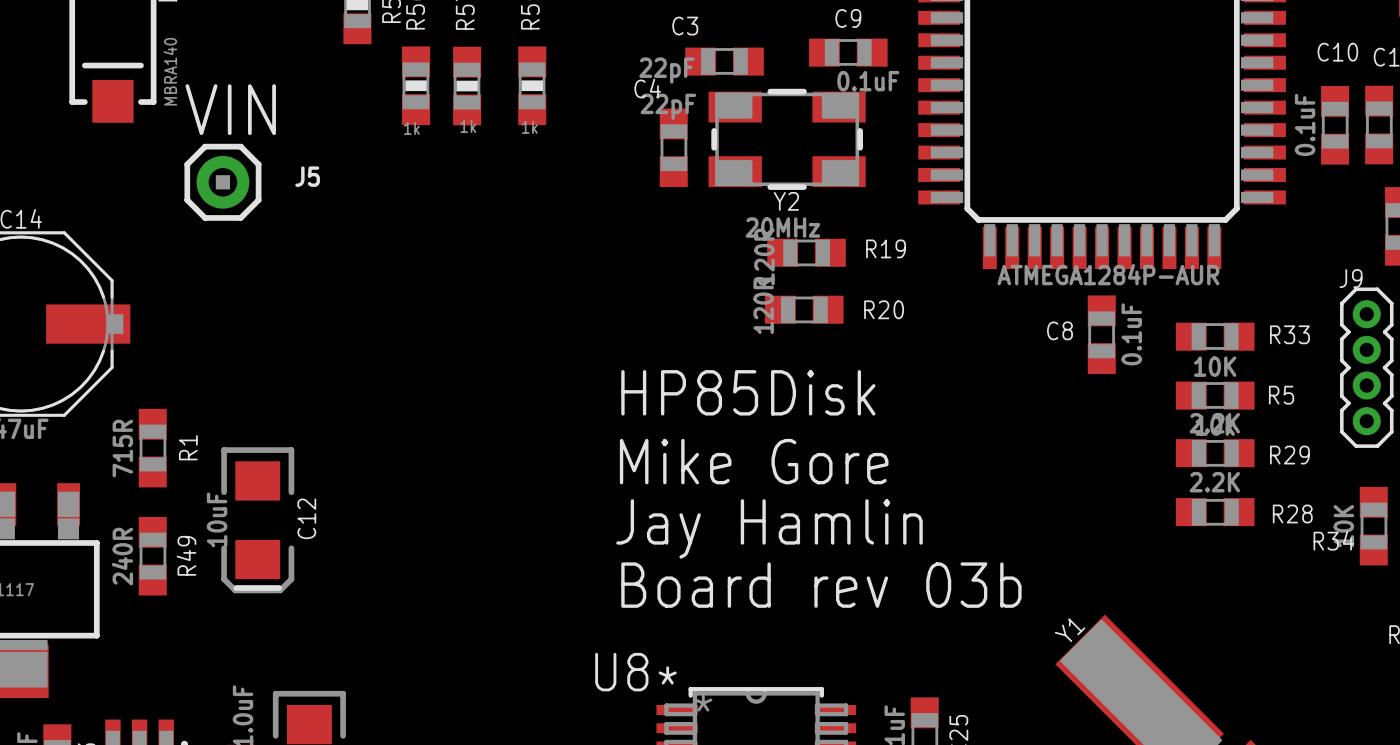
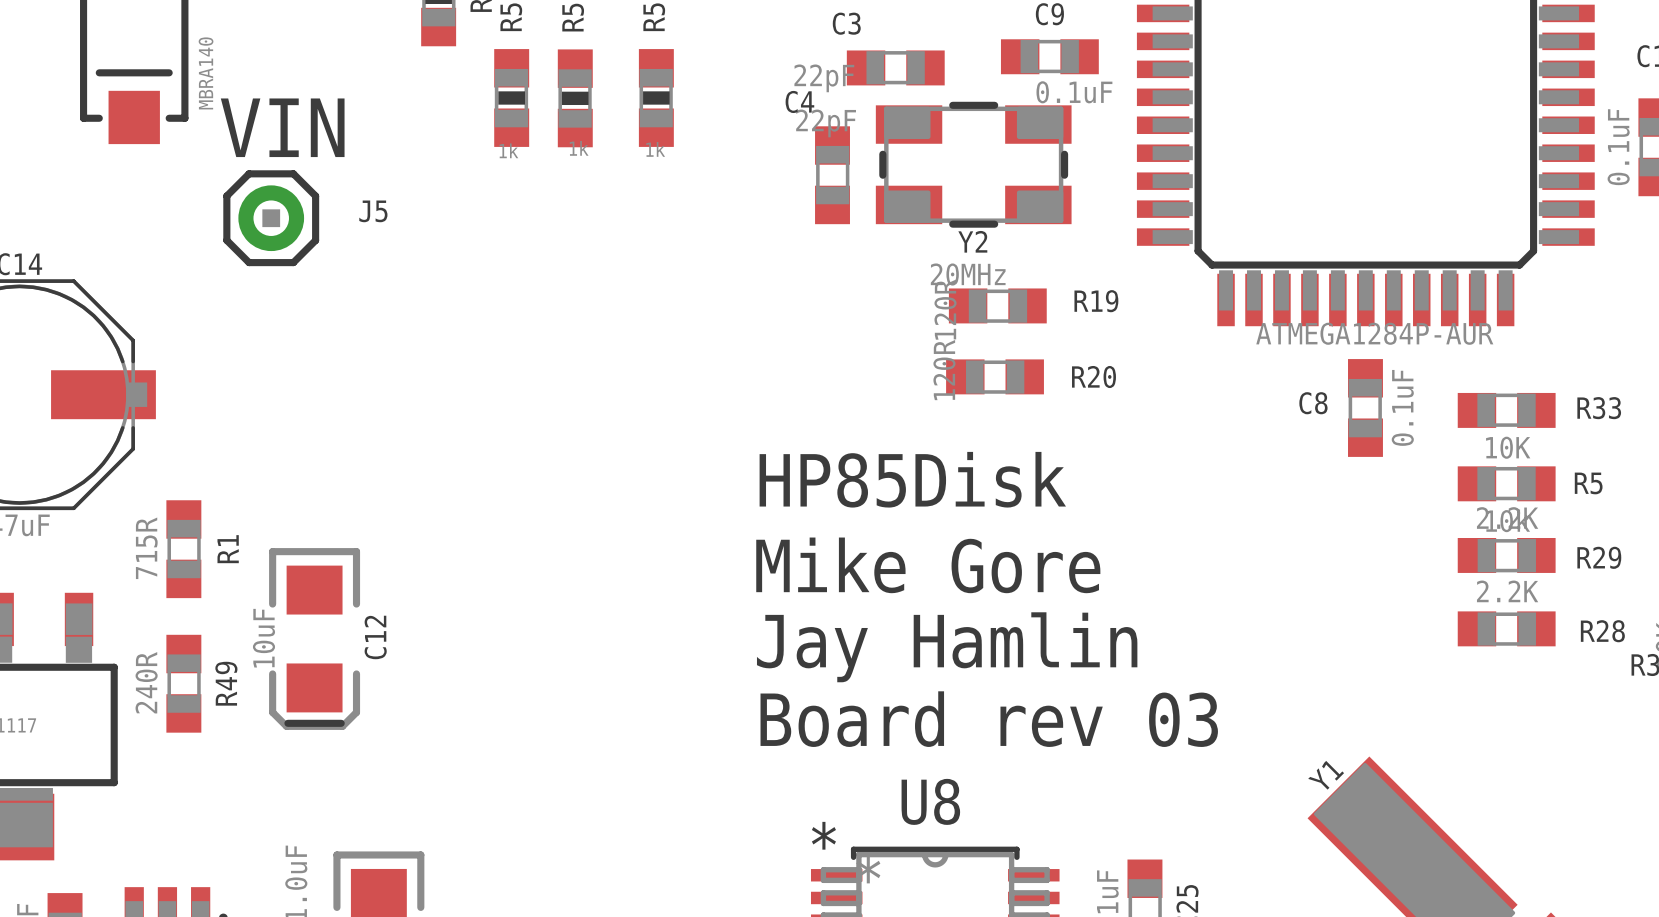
text: Board rev 03b (821, 585) -> Board rev 03 (989, 719)
U8 name position: U8 (621, 672) -> U8 (930, 801)

